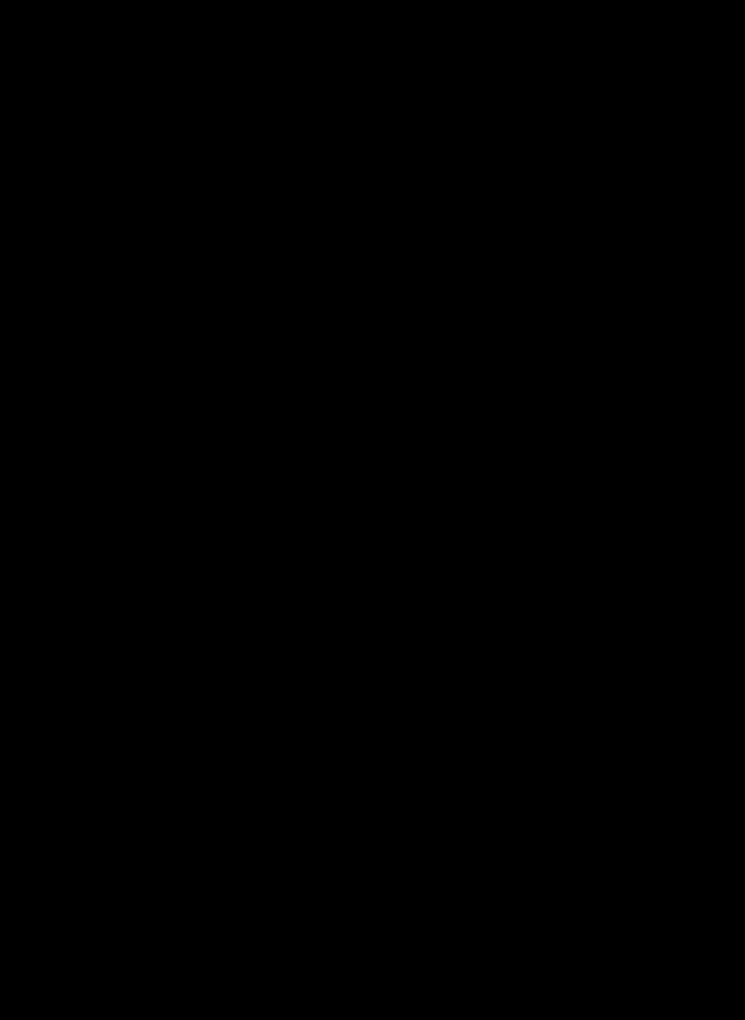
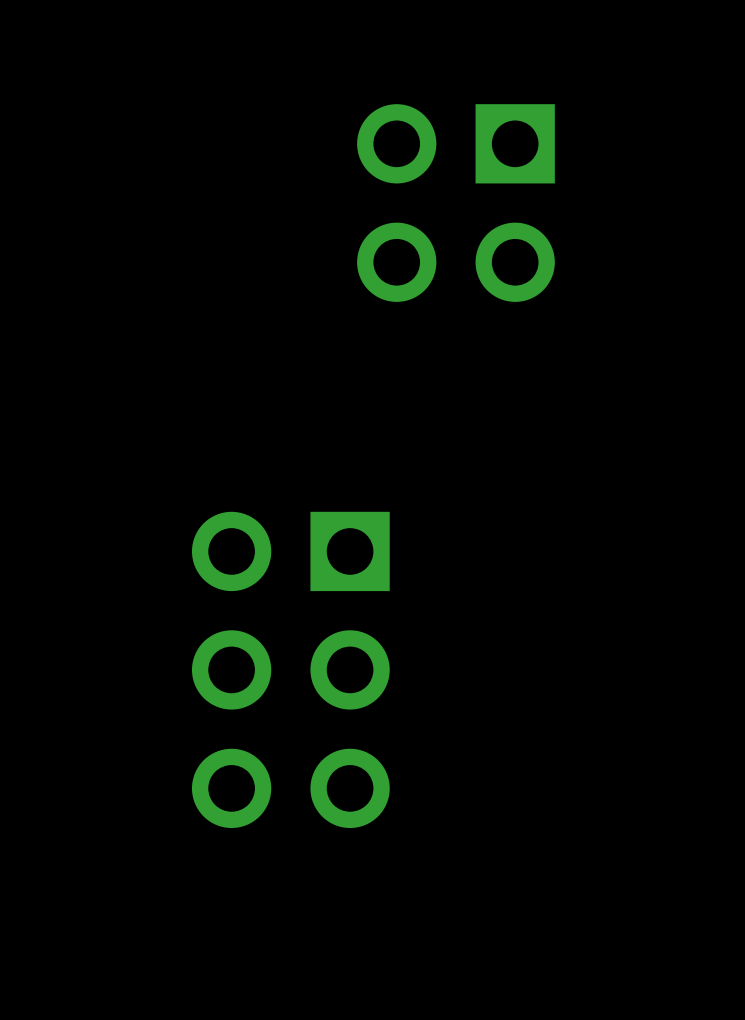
part: none -> (455, 203)
part: none -> (290, 669)

